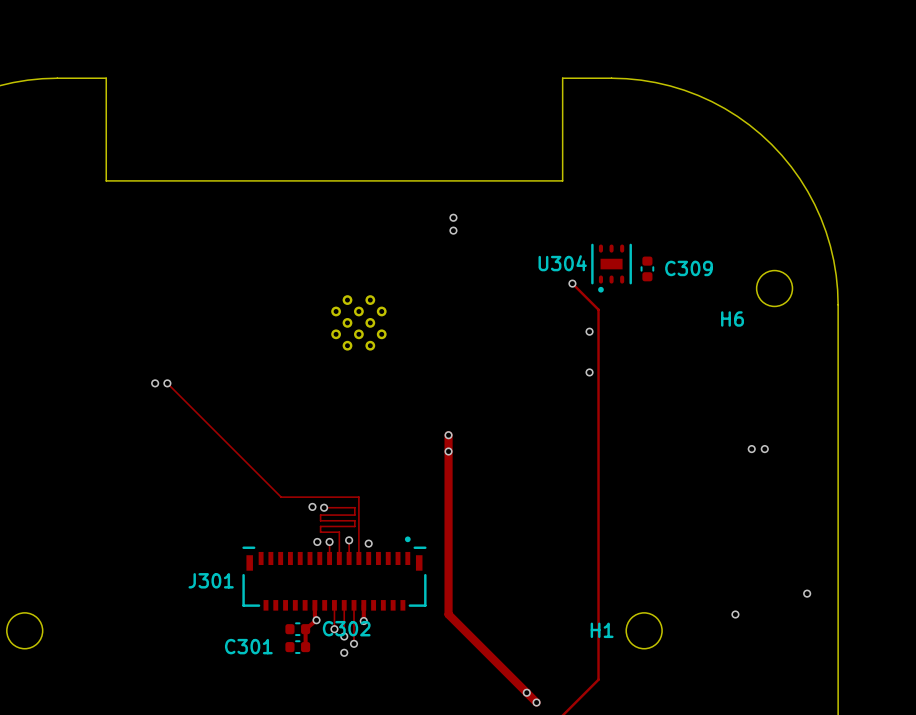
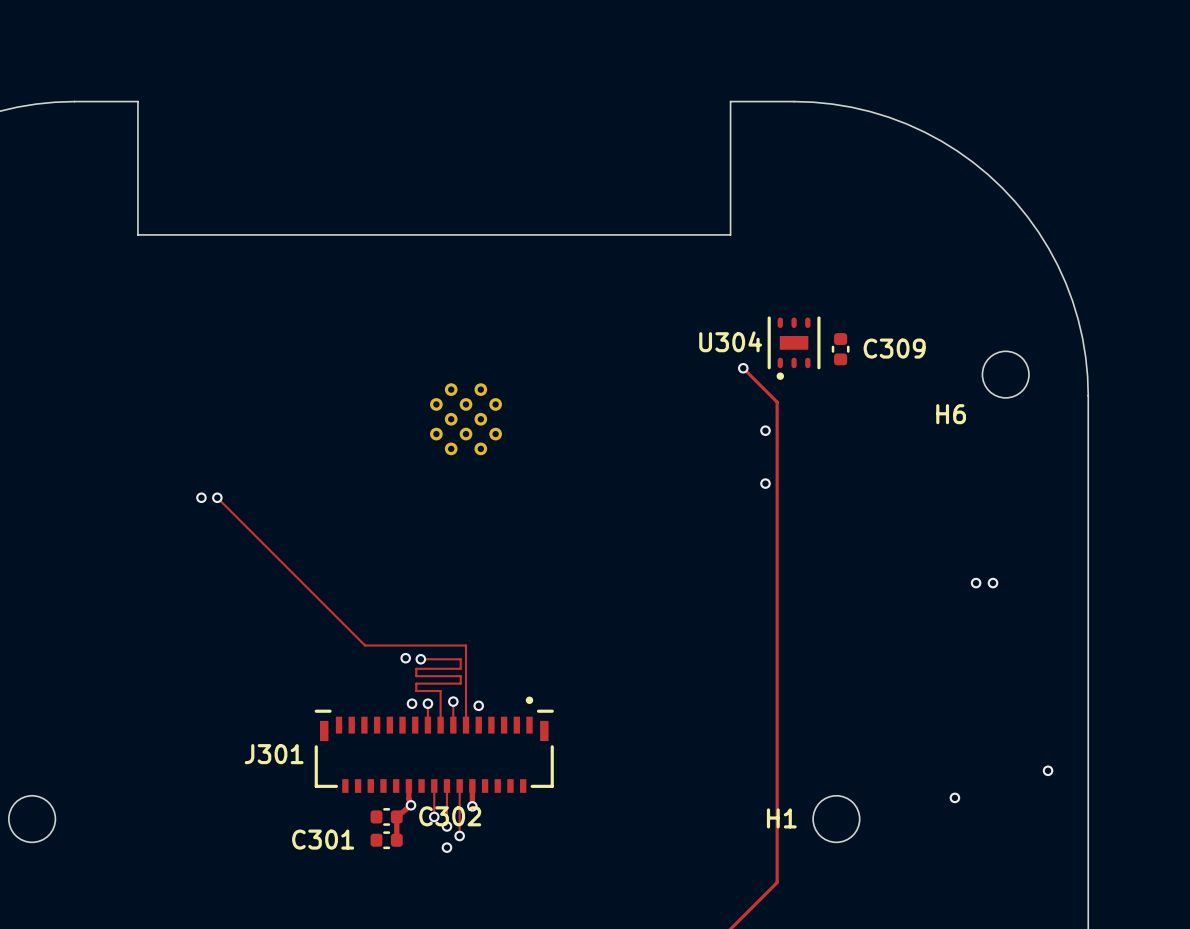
via: (453, 217) -> none
via: (453, 230) -> none
track: (448, 435) (448, 614) (536, 702) -> none
via: (448, 435) -> none
via: (448, 451) -> none
via: (526, 692) -> none
via: (536, 702) -> none

